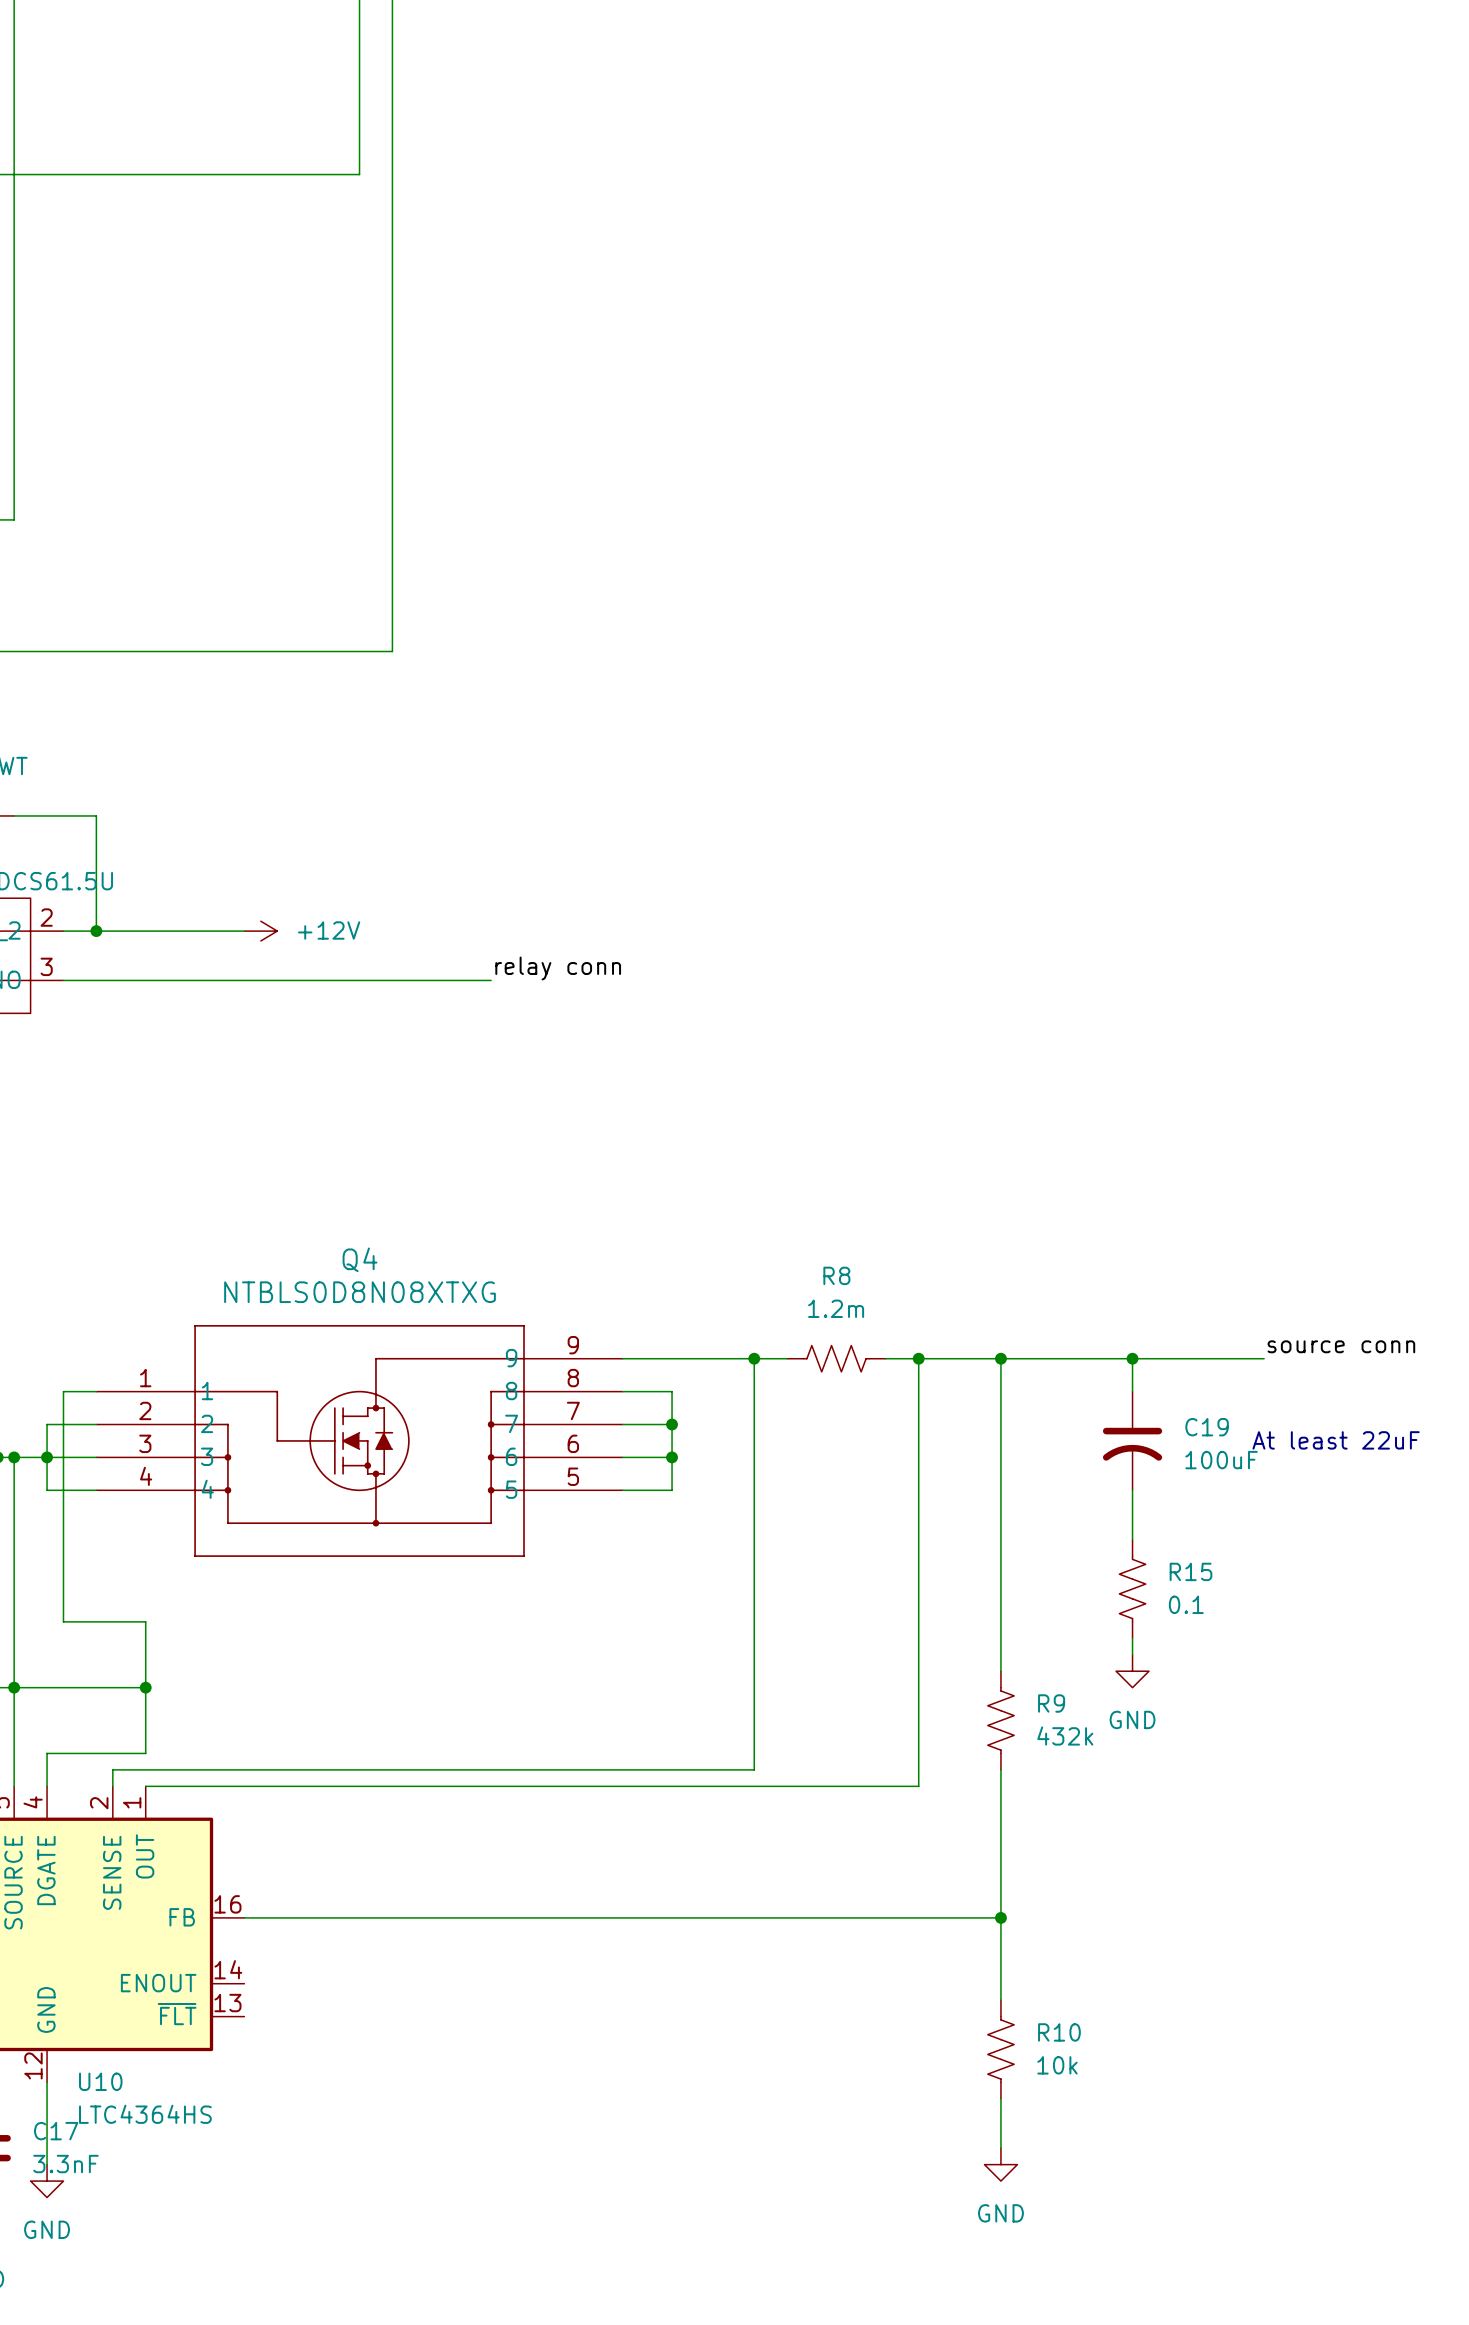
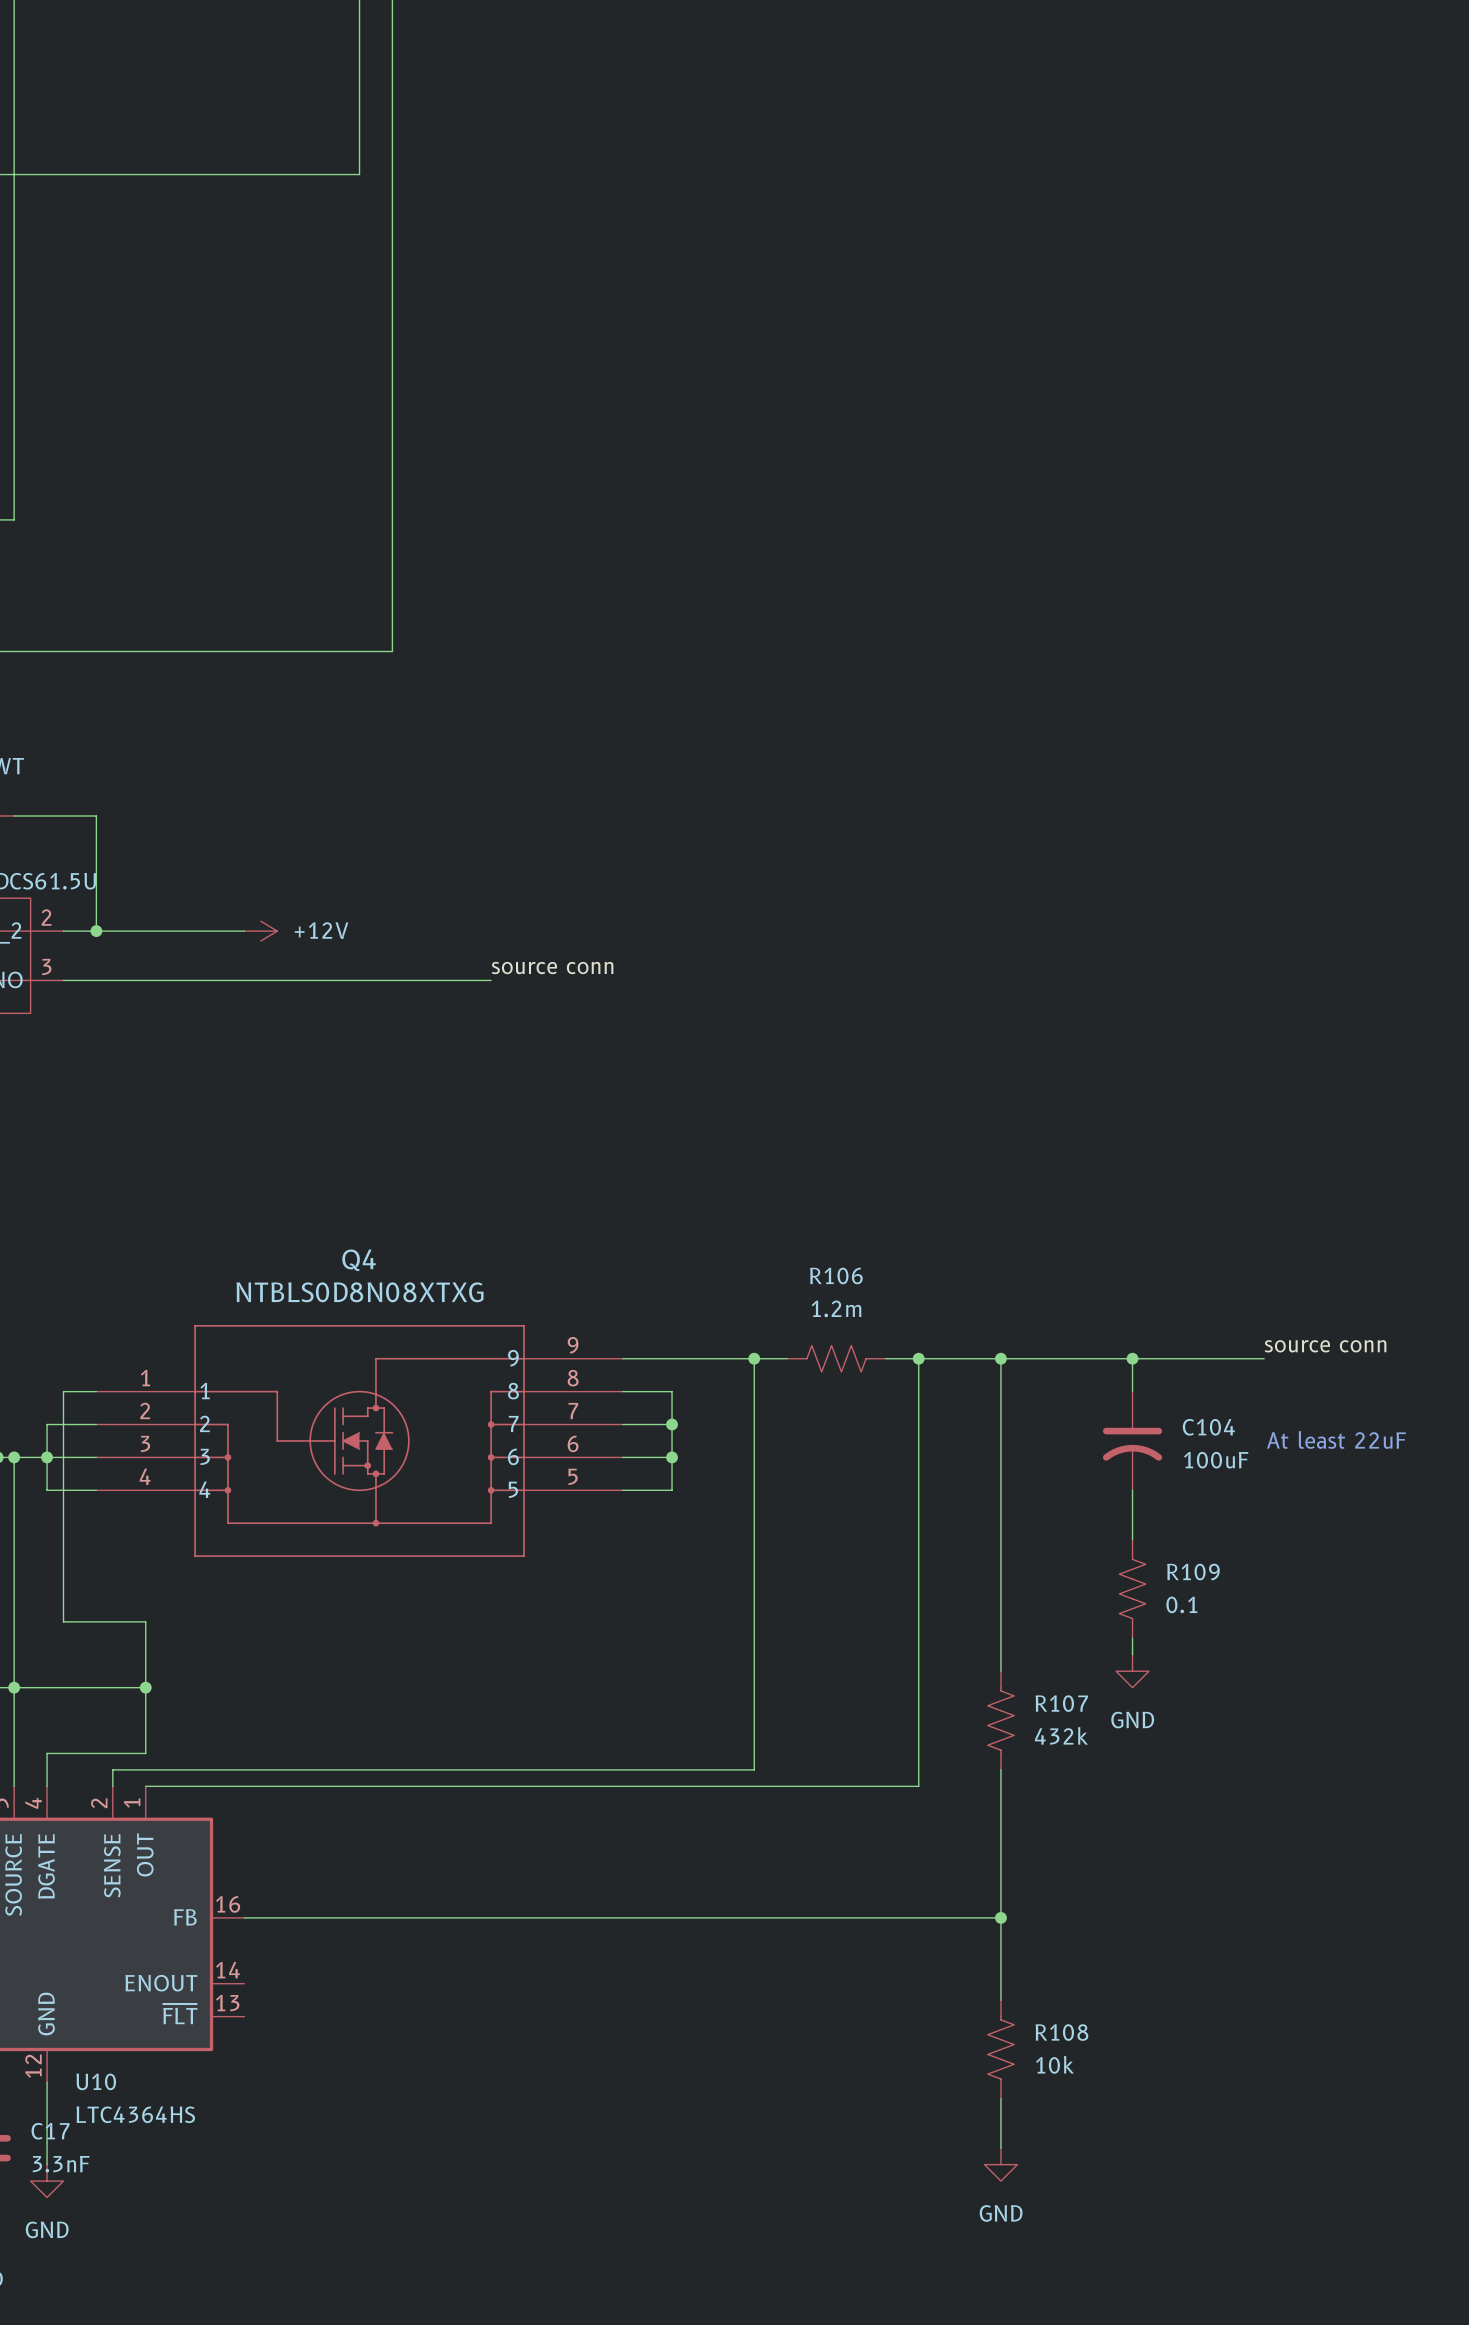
label: relay conn (558, 968) -> source conn (552, 968)
R8 name: R8 (836, 1275) -> R106 (836, 1275)
C19 name: C19 (1207, 1427) -> C104 (1208, 1427)
R15 name: R15 (1191, 1571) -> R109 (1193, 1572)
R9 name: R9 (1051, 1703) -> R107 (1061, 1703)
R10 name: R10 (1059, 2032) -> R108 (1061, 2032)

